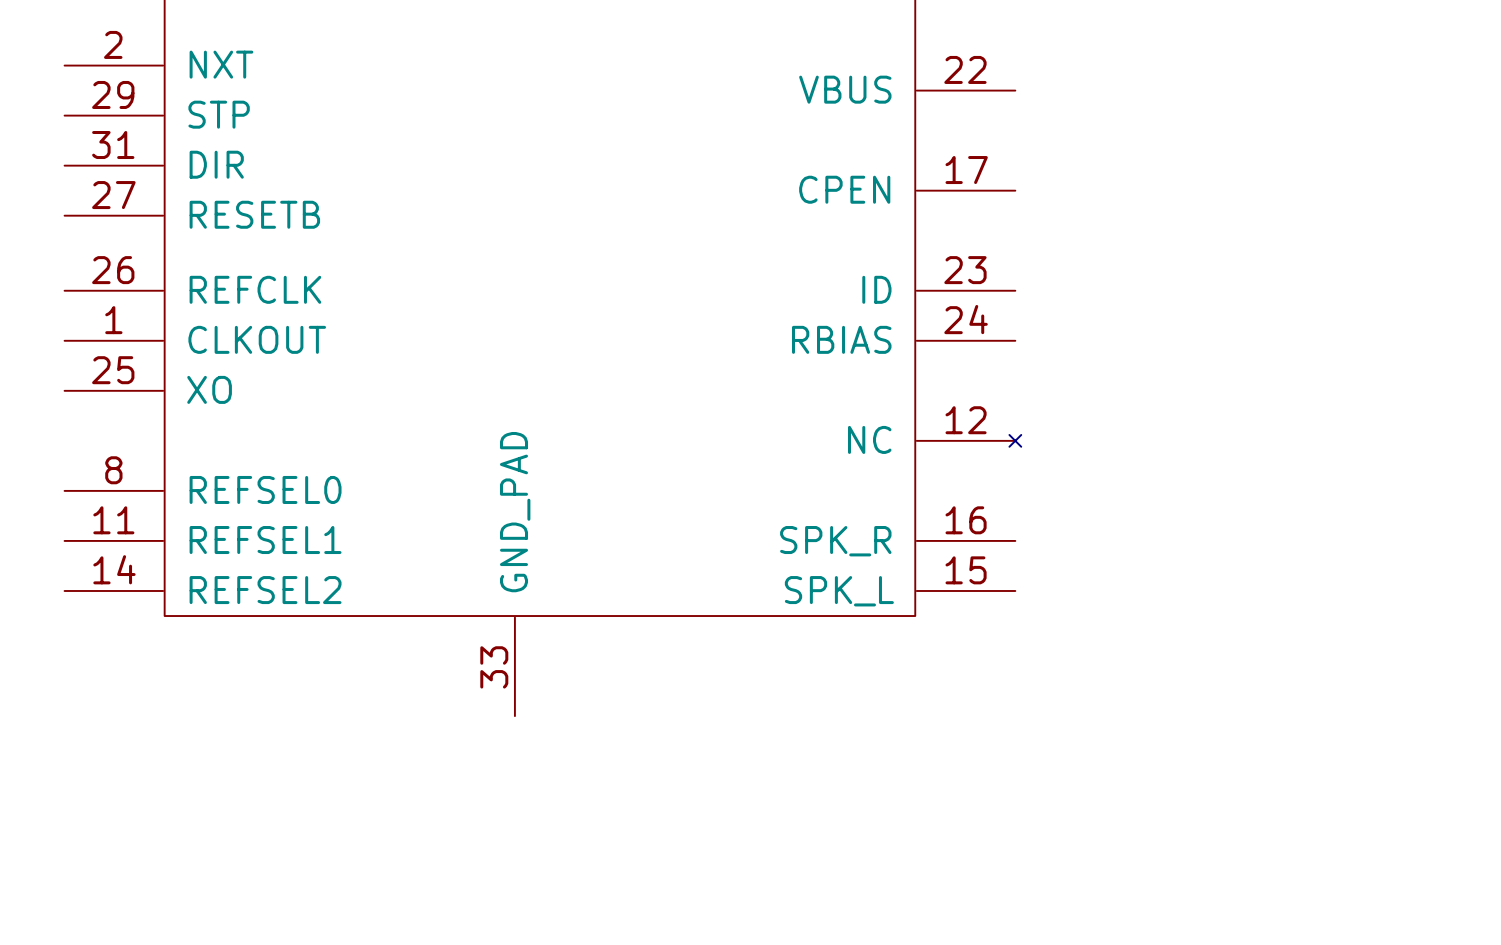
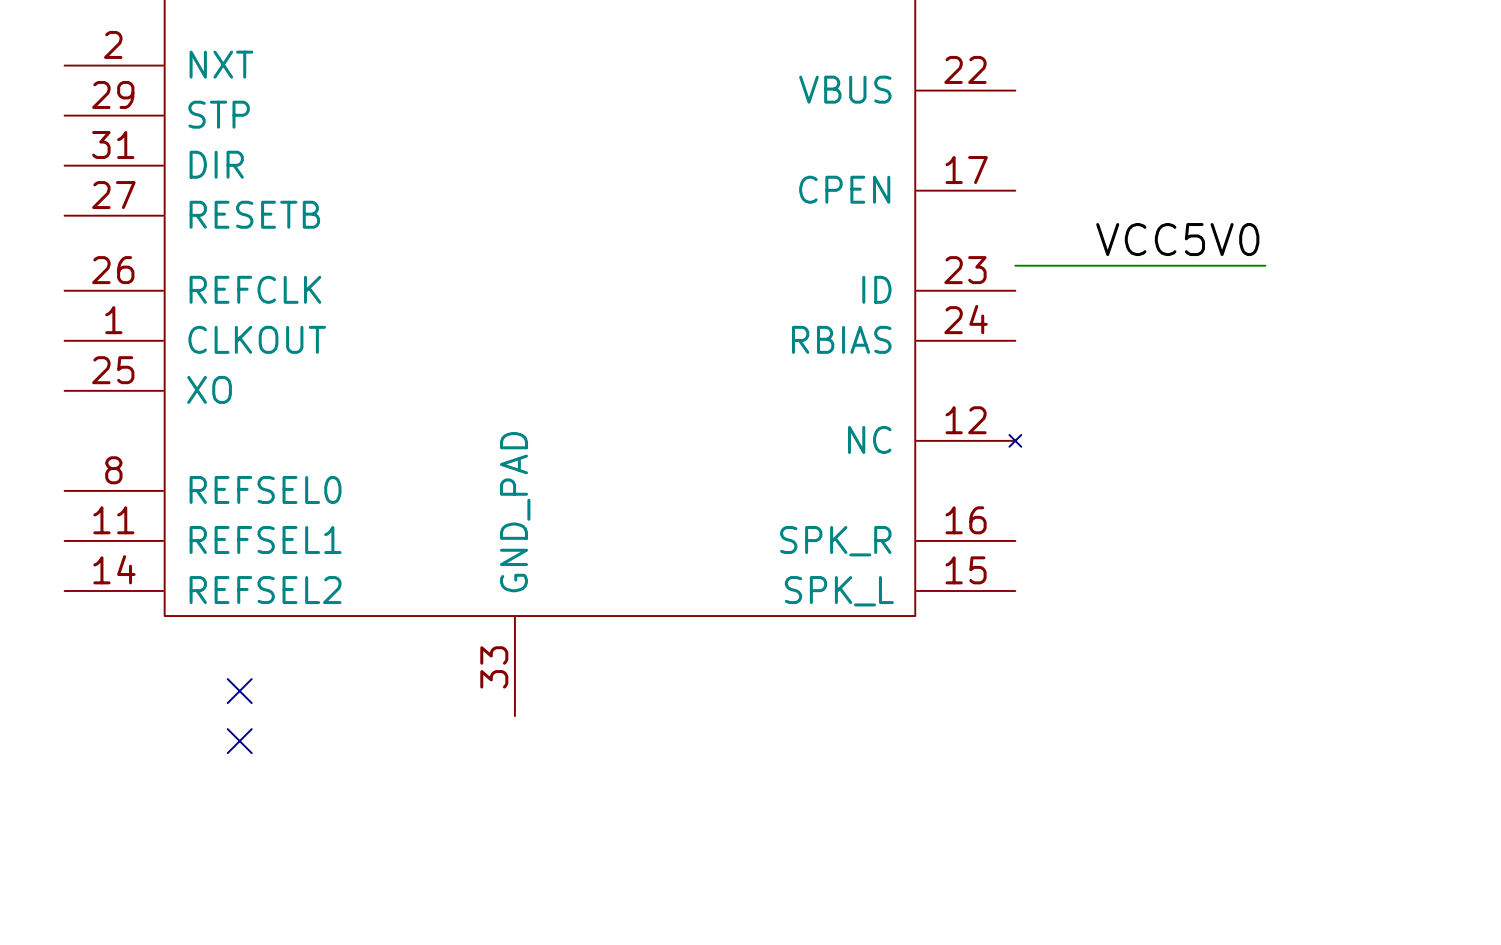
label: none -> VCC5V0 (1177, 239)
wire: none -> (1015, 265) (1265, 265)
no-connect mark: none -> (239, 691)
no-connect mark: none -> (239, 741)

